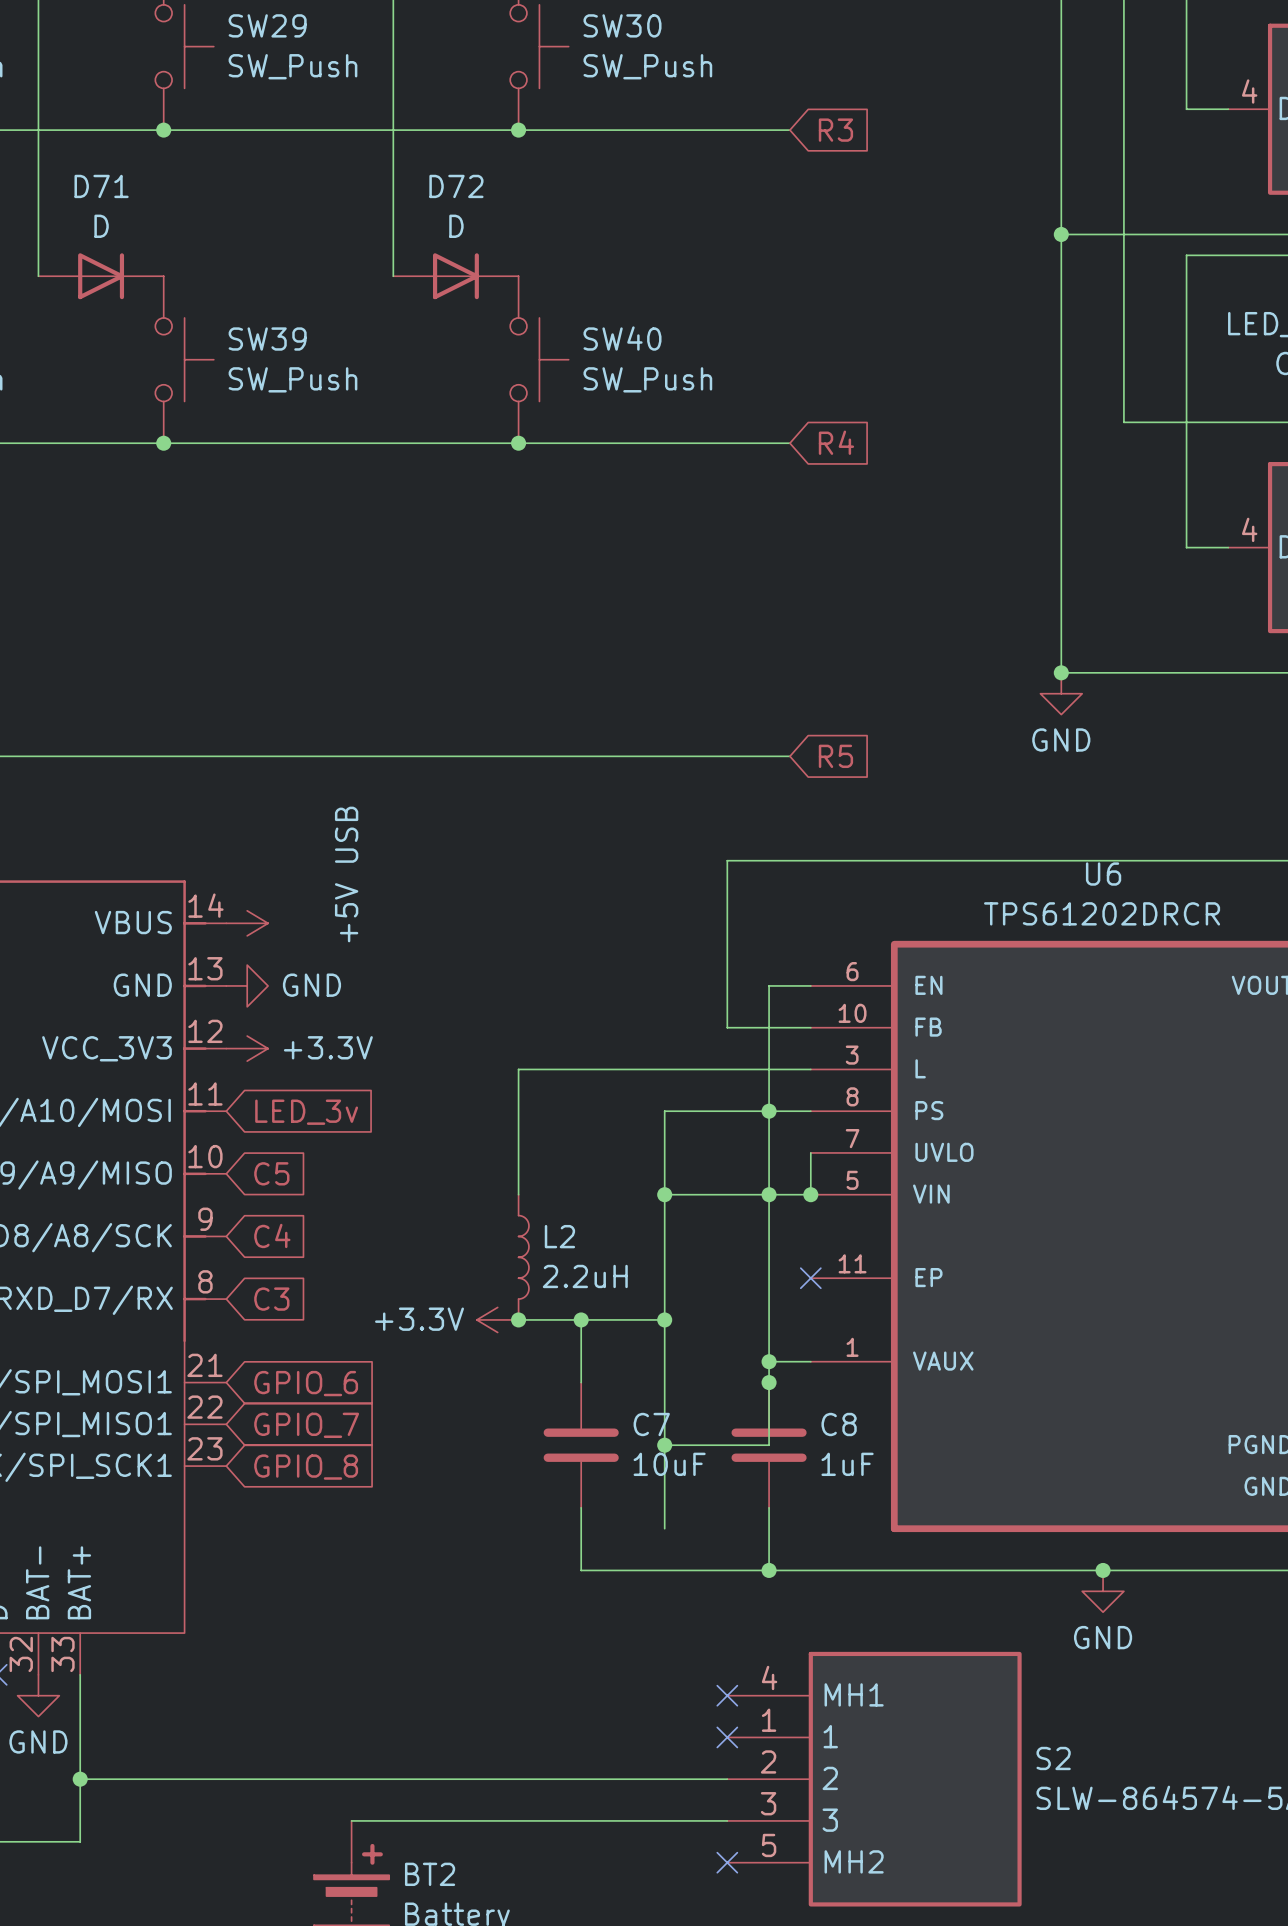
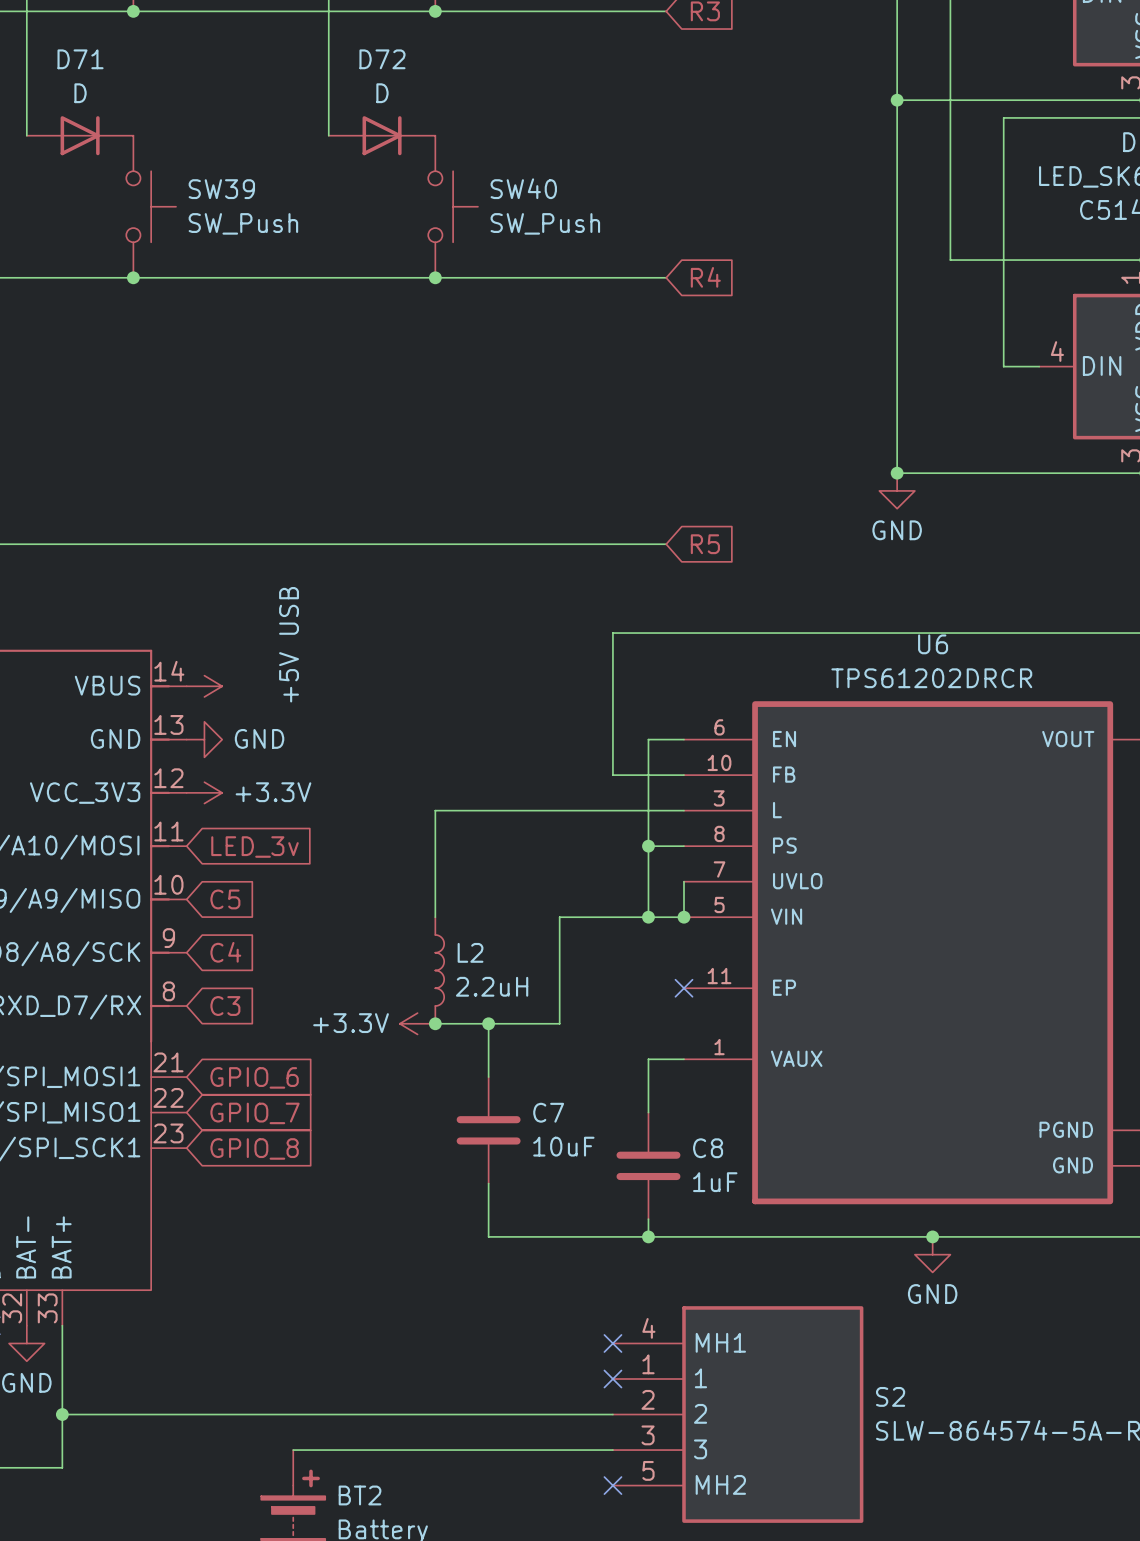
wire: (769, 1111) (664, 1111) (664, 1194) -> none
junction: (664, 1194) -> none
wire: (769, 1194) (769, 1361) -> none
wire: (664, 1319) (664, 1528) -> none
junction: (664, 1319) -> none
junction: (769, 1361) -> none
junction: (769, 1382) -> none
wire: (769, 1424) (769, 1445) (664, 1445) -> none
junction: (664, 1445) -> none
C8 position: (769, 1445) -> (648, 1165)

